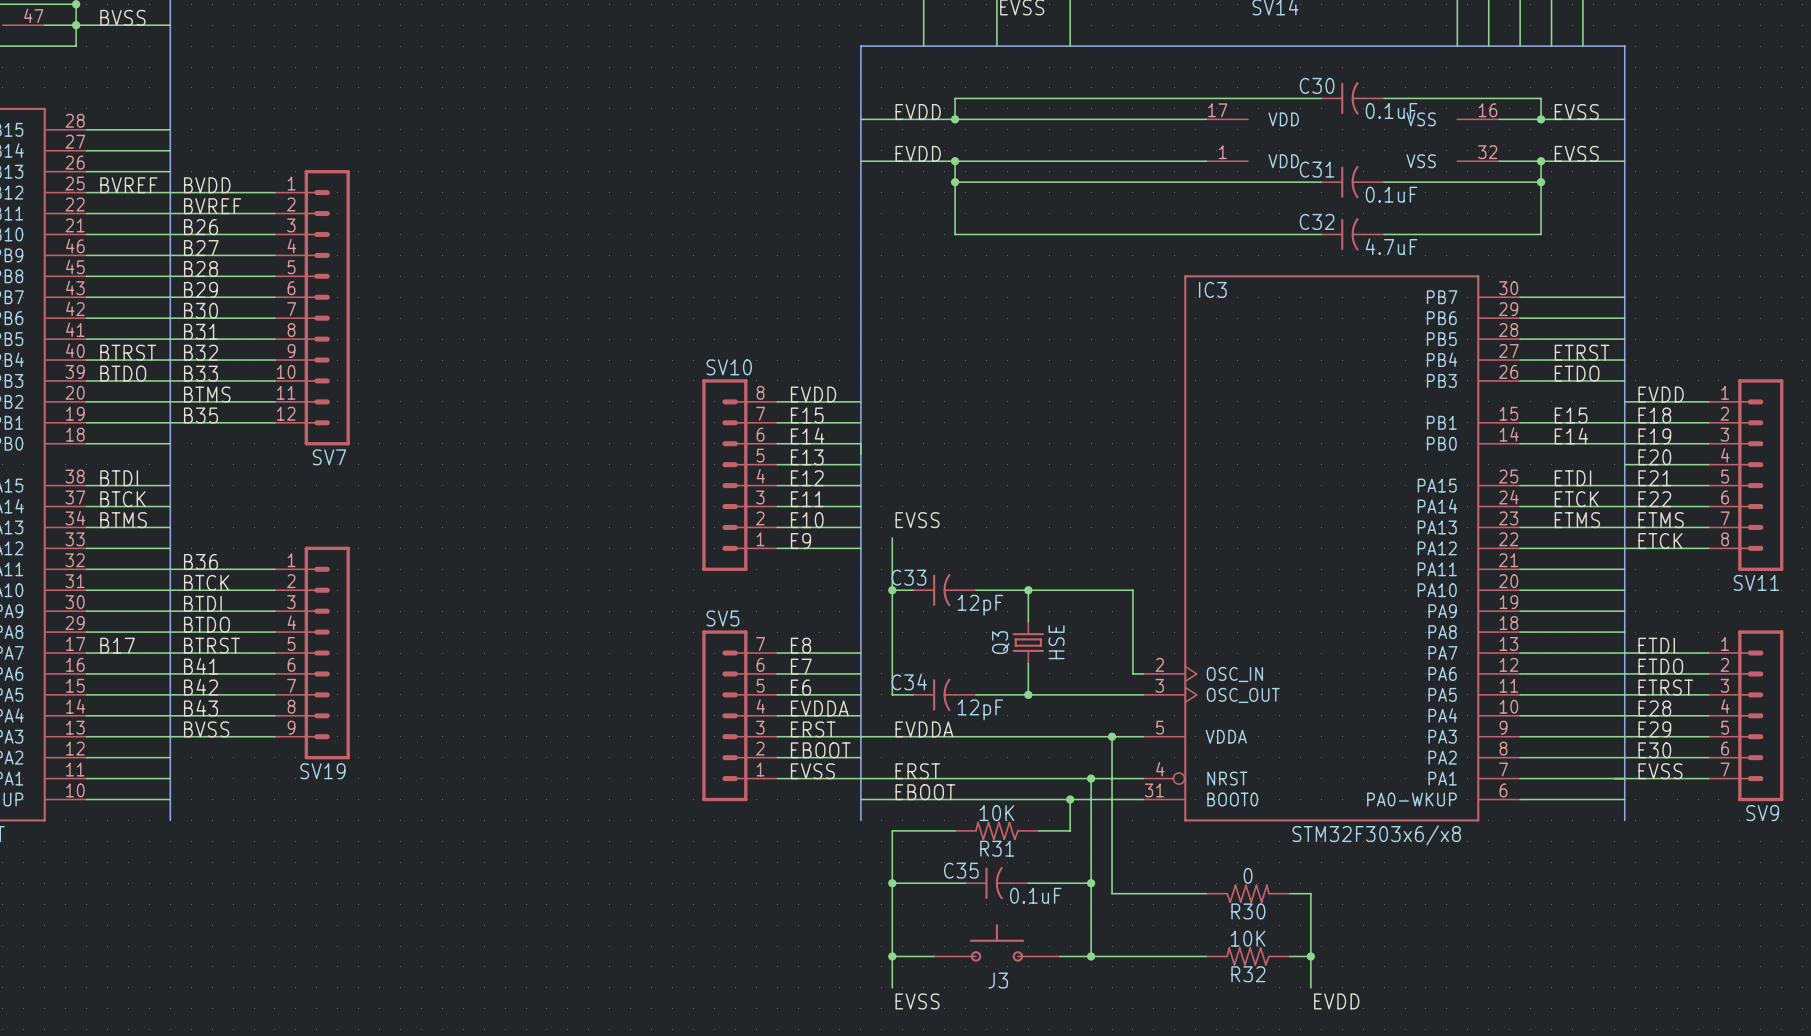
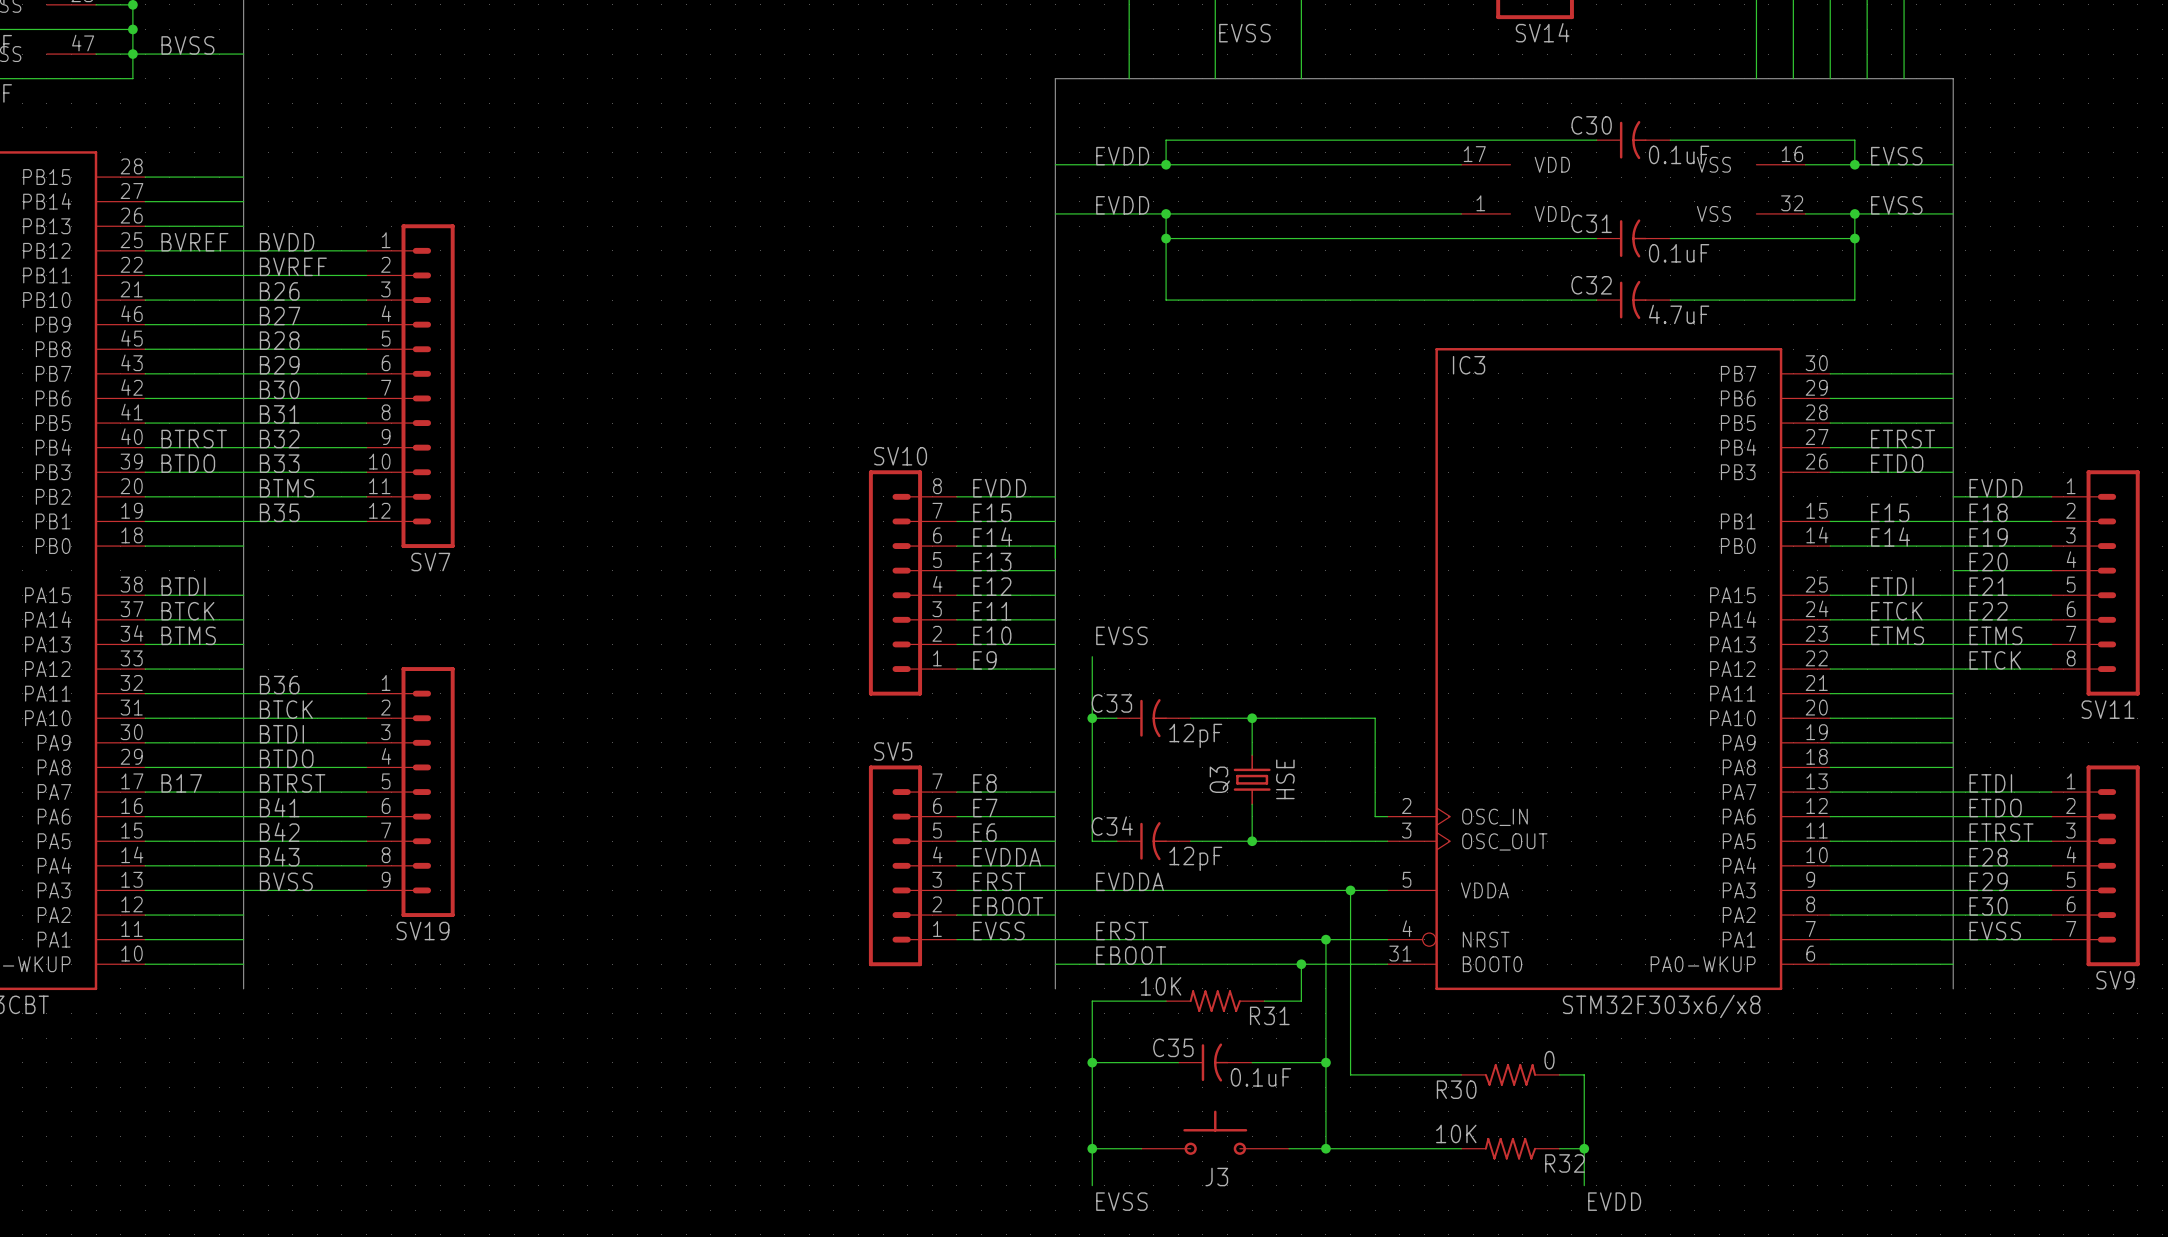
R31 value position: 10K (996, 813) -> 10K (1161, 986)
R31 name position: R31 (997, 848) -> R31 (1269, 1015)
R30 value position: 0 (1248, 875) -> 0 (1549, 1060)
R30 name position: R30 (1248, 911) -> R30 (1456, 1089)
R32 value position: 10K (1248, 938) -> 10K (1456, 1133)
R32 name position: R32 (1248, 974) -> R32 (1564, 1163)

